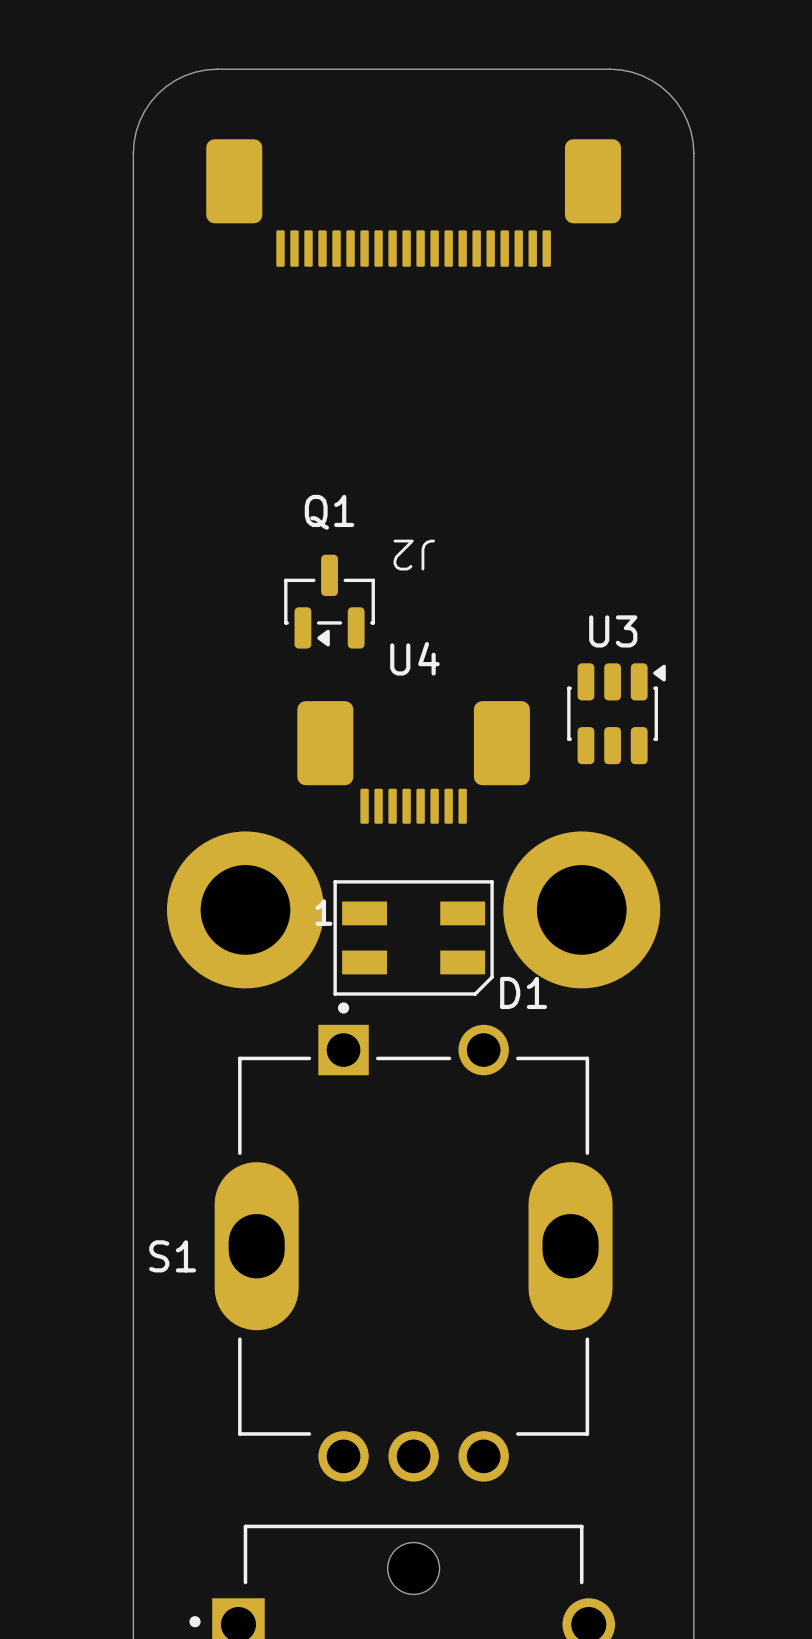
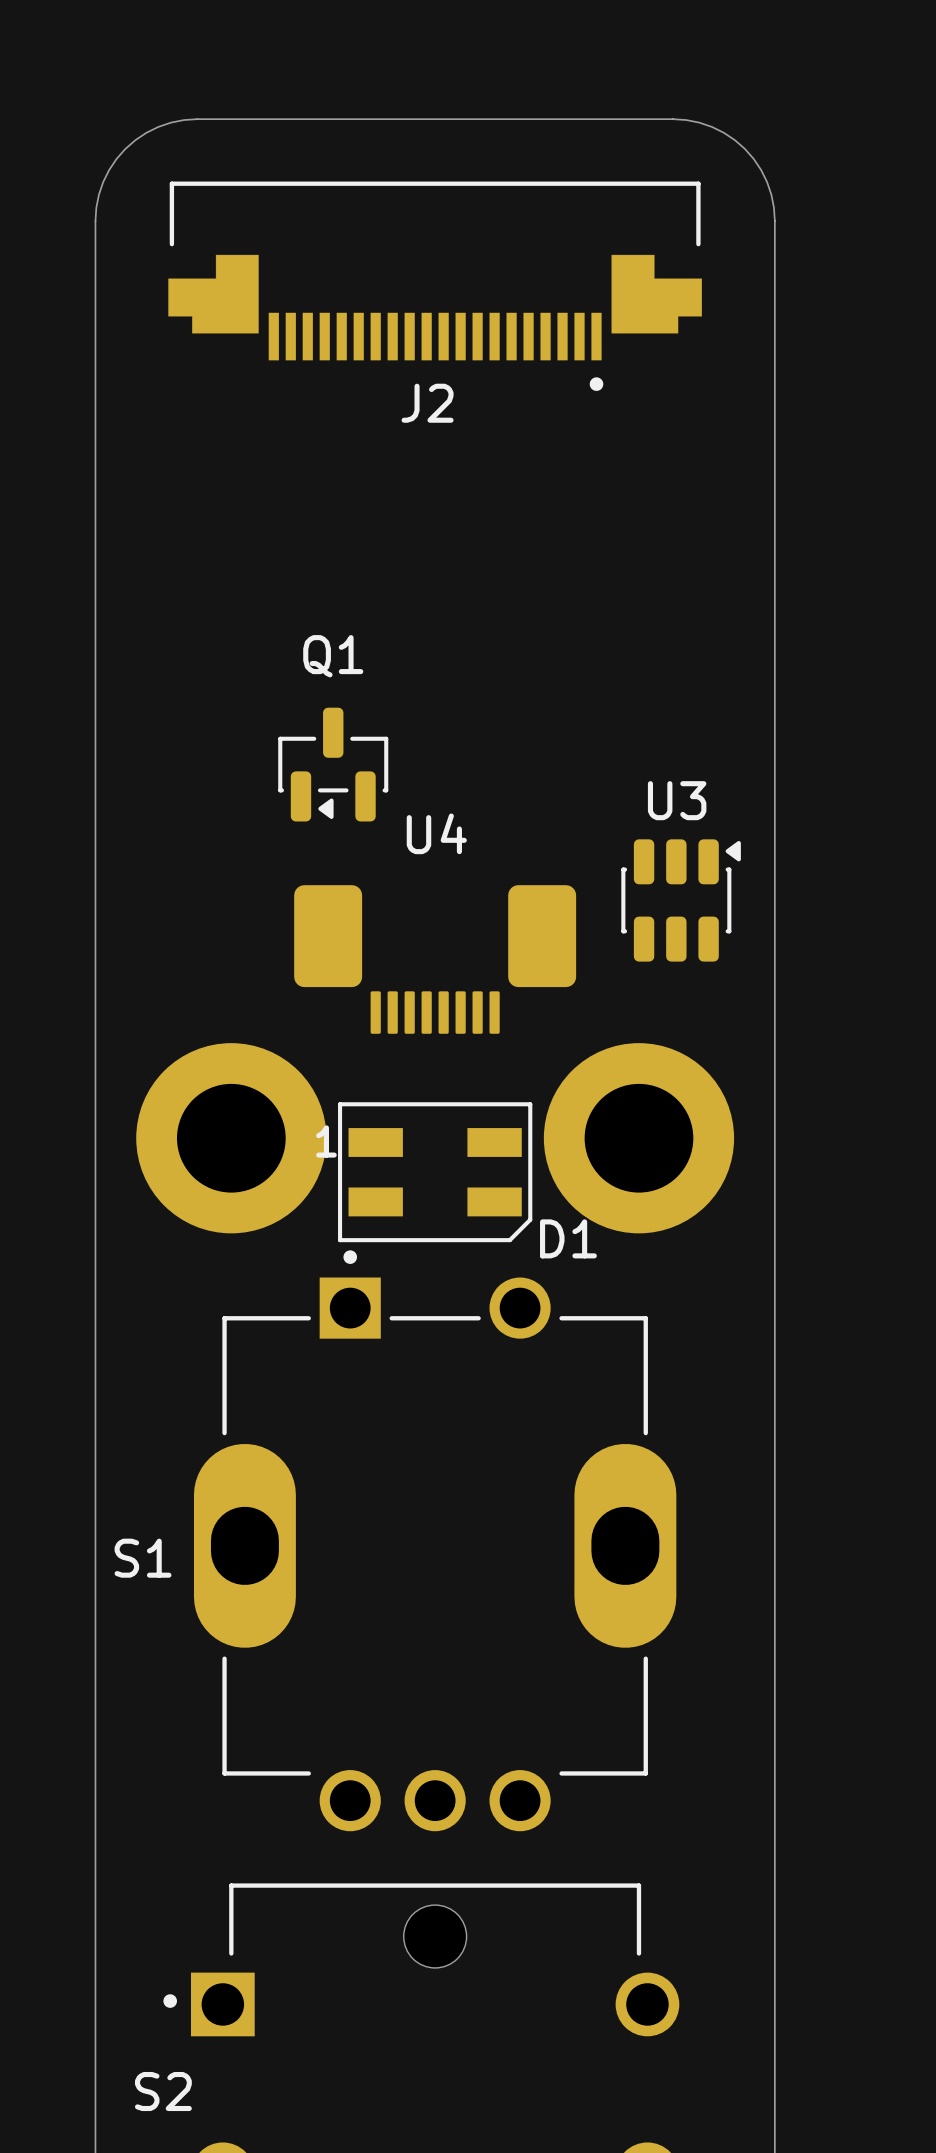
J2 footprint: [206, 139, 621, 267] -> [168, 181, 702, 391]
J2 name position: J2 (414, 555) -> J2 (427, 403)

